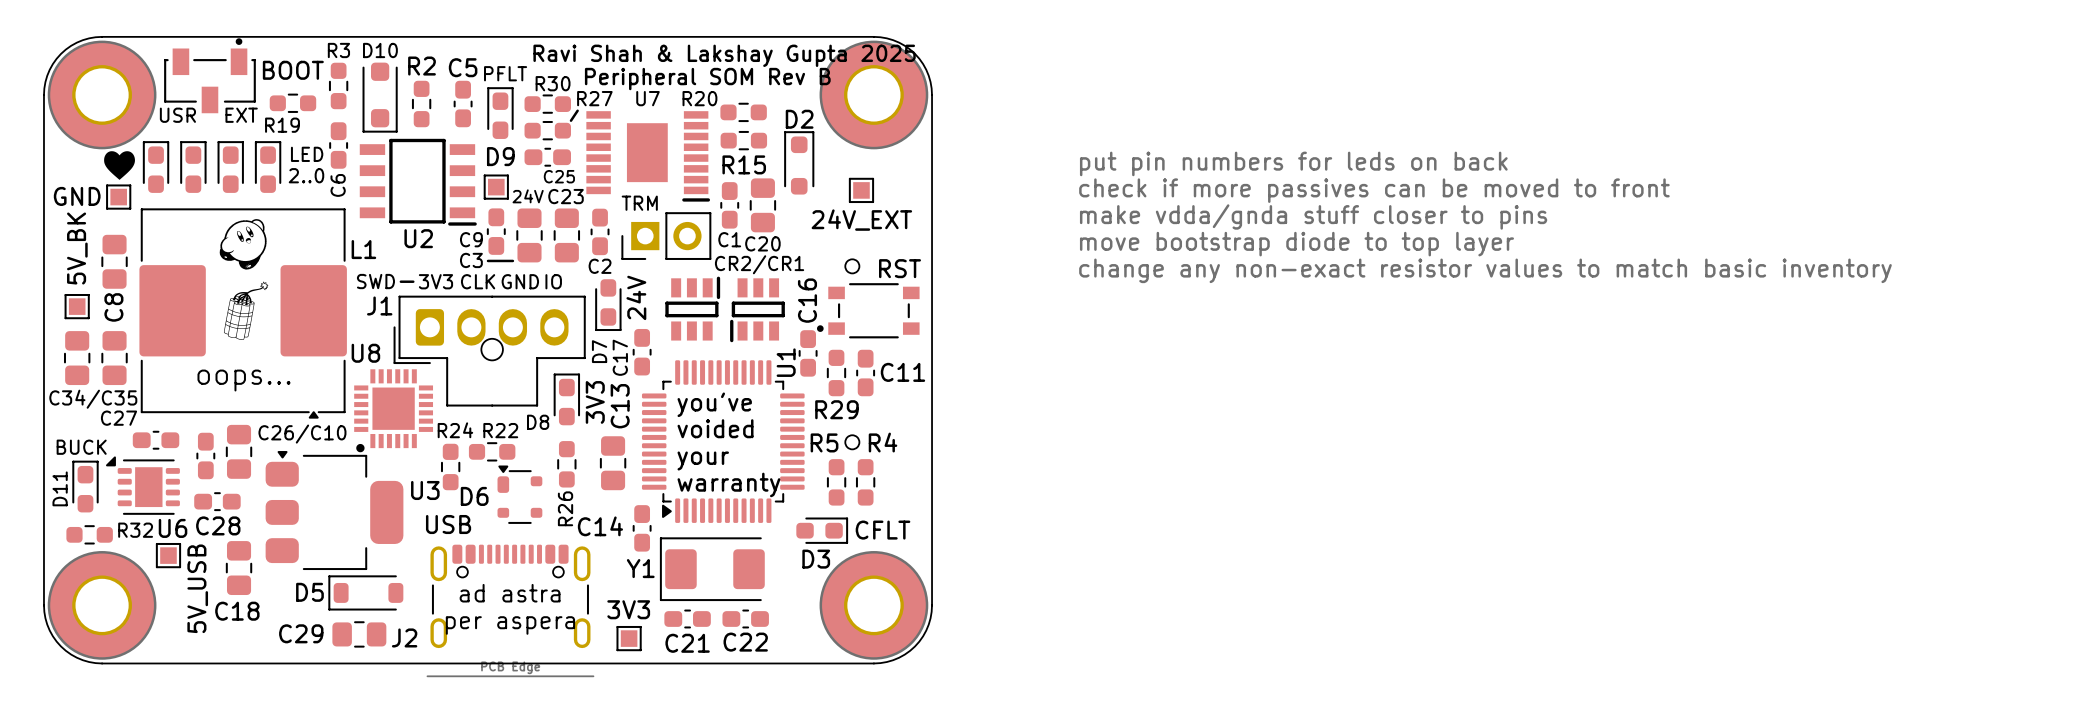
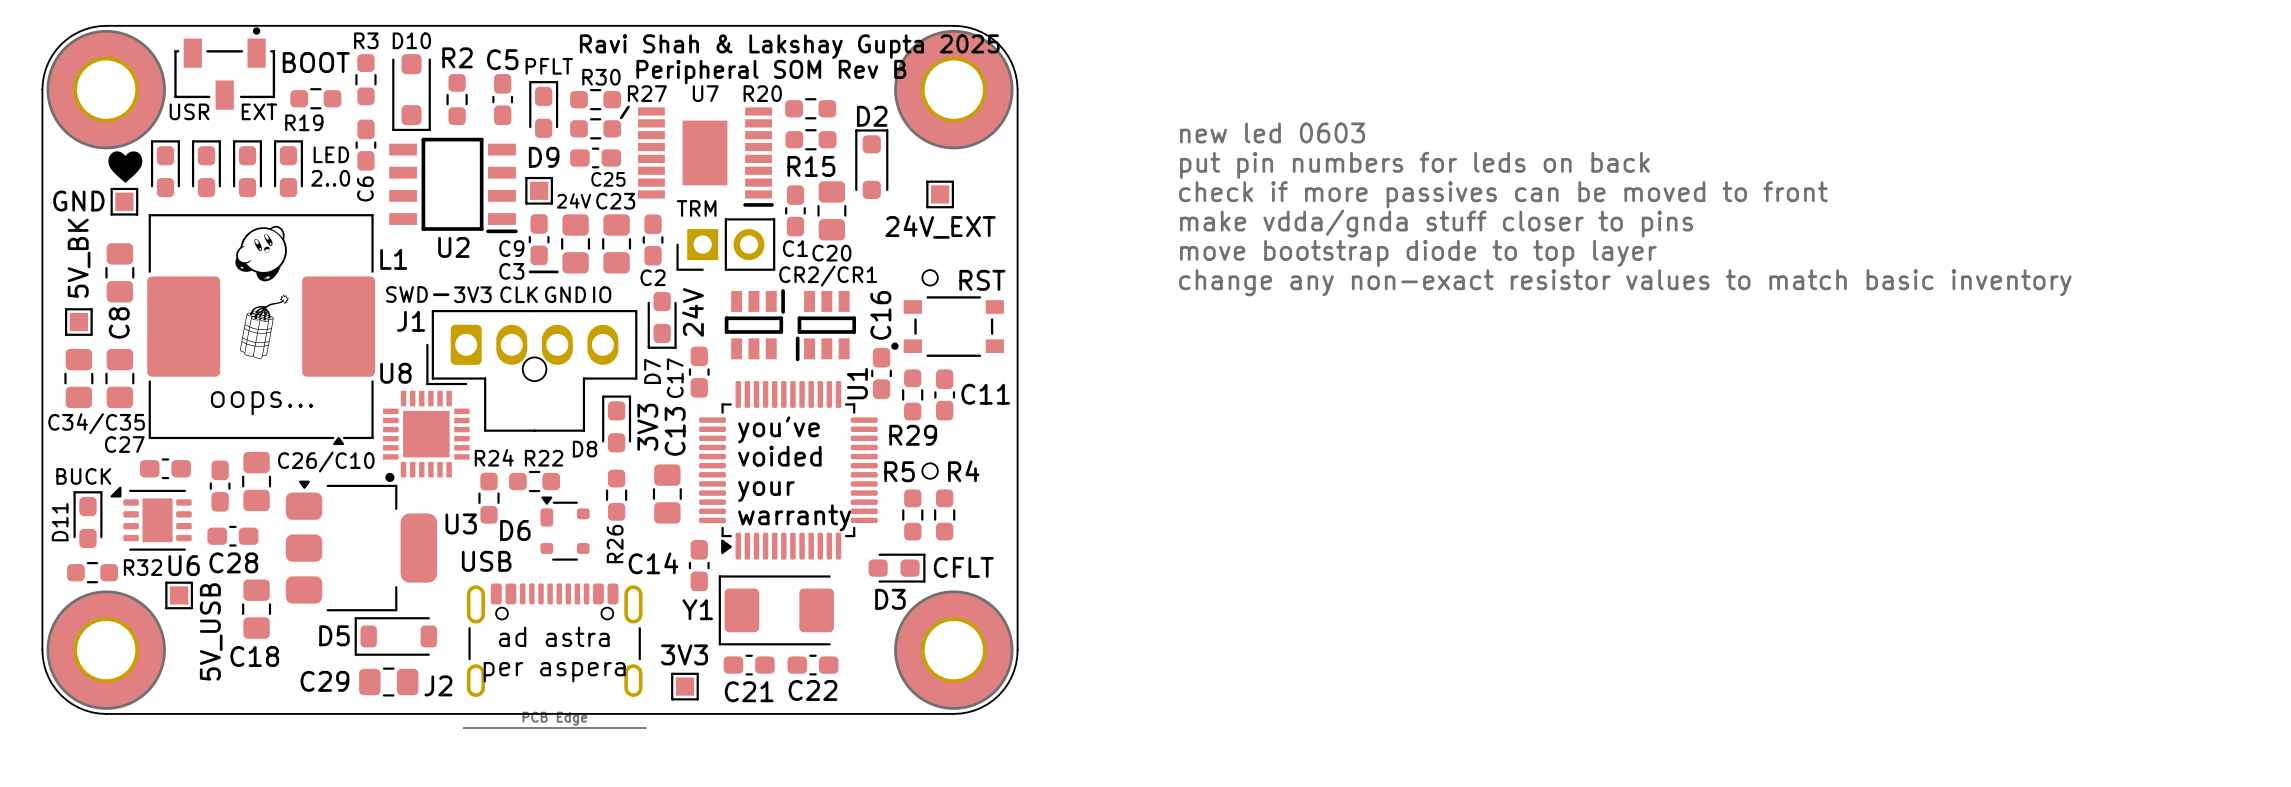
text: none -> new led 0603 (1272, 132)

